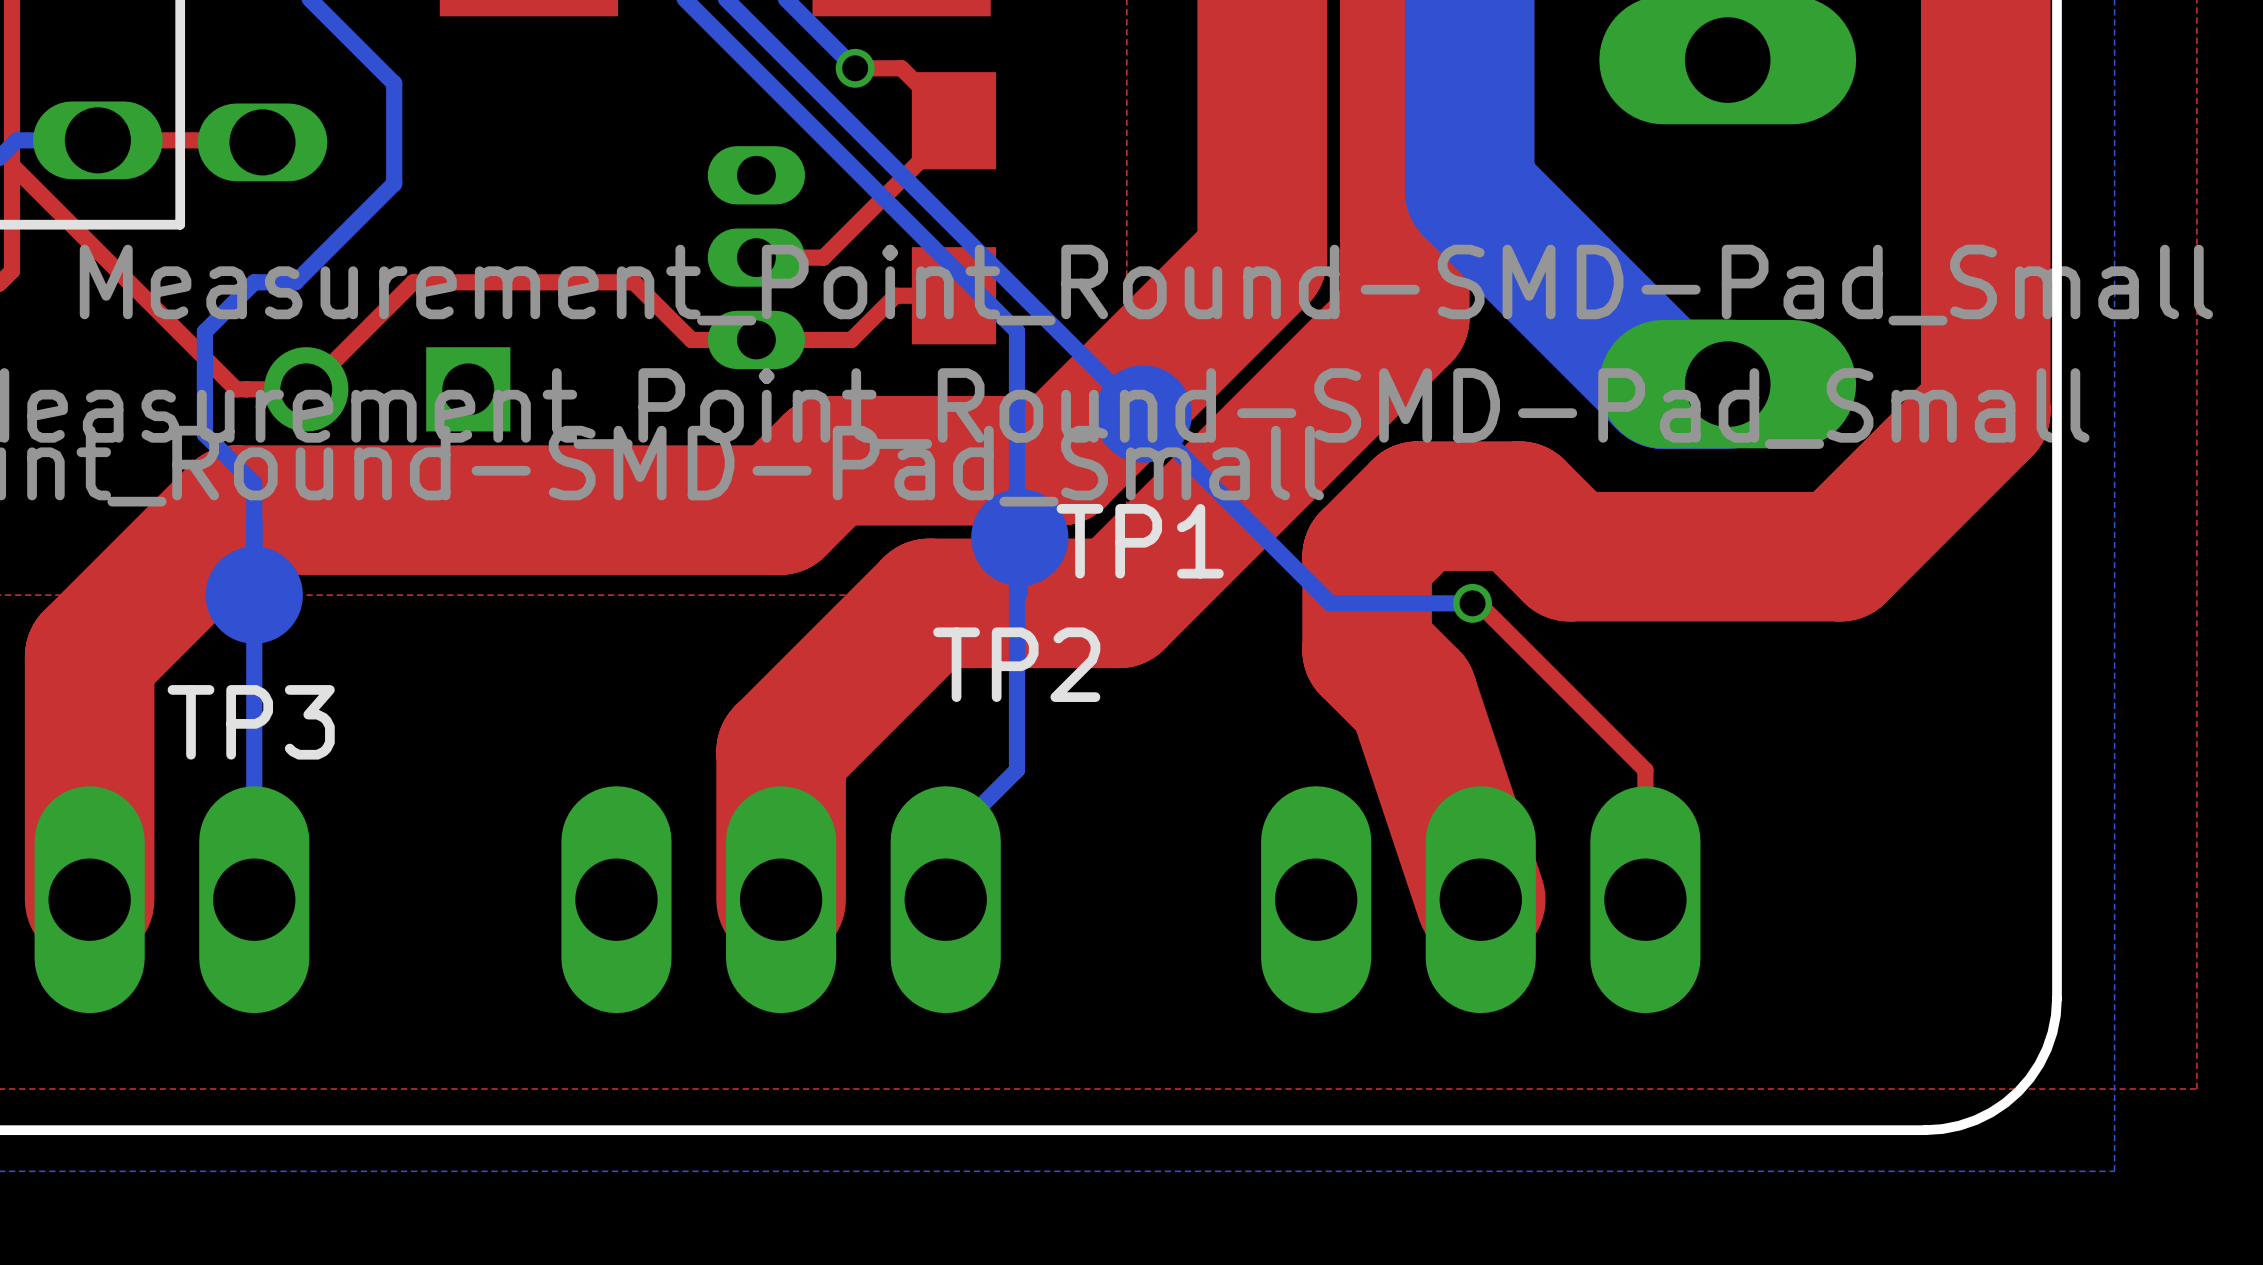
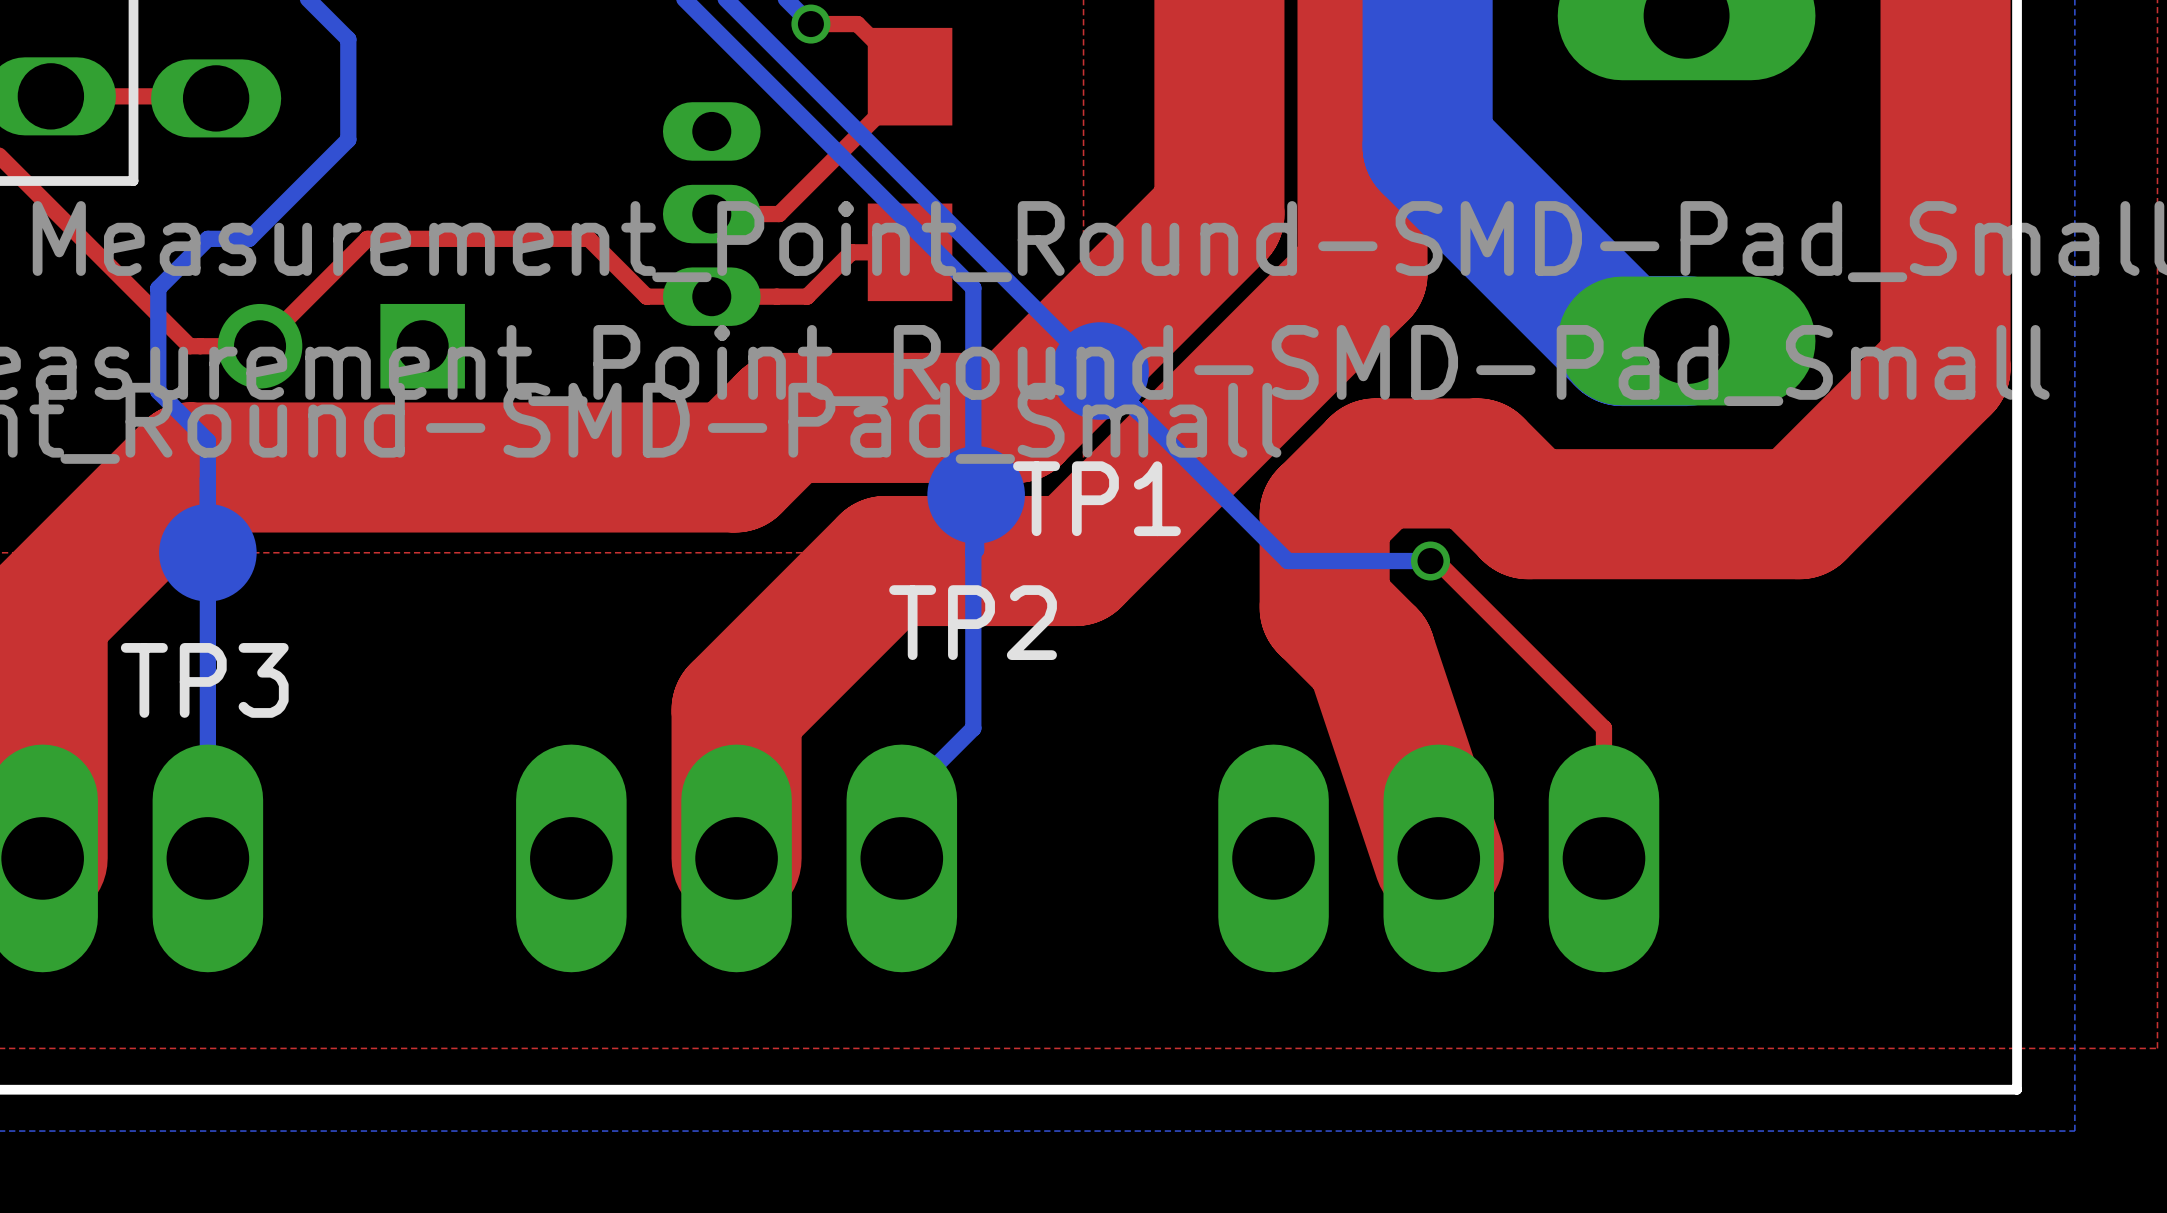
board edge: (2056, 998) (2052, 1032) (2046, 1048) (2039, 1064) (2018, 1091) (1991, 1112) (1975, 1120) (1959, 1125) (1925, 1130) -> (2017, 957) (2017, 1089) (1884, 1089)

